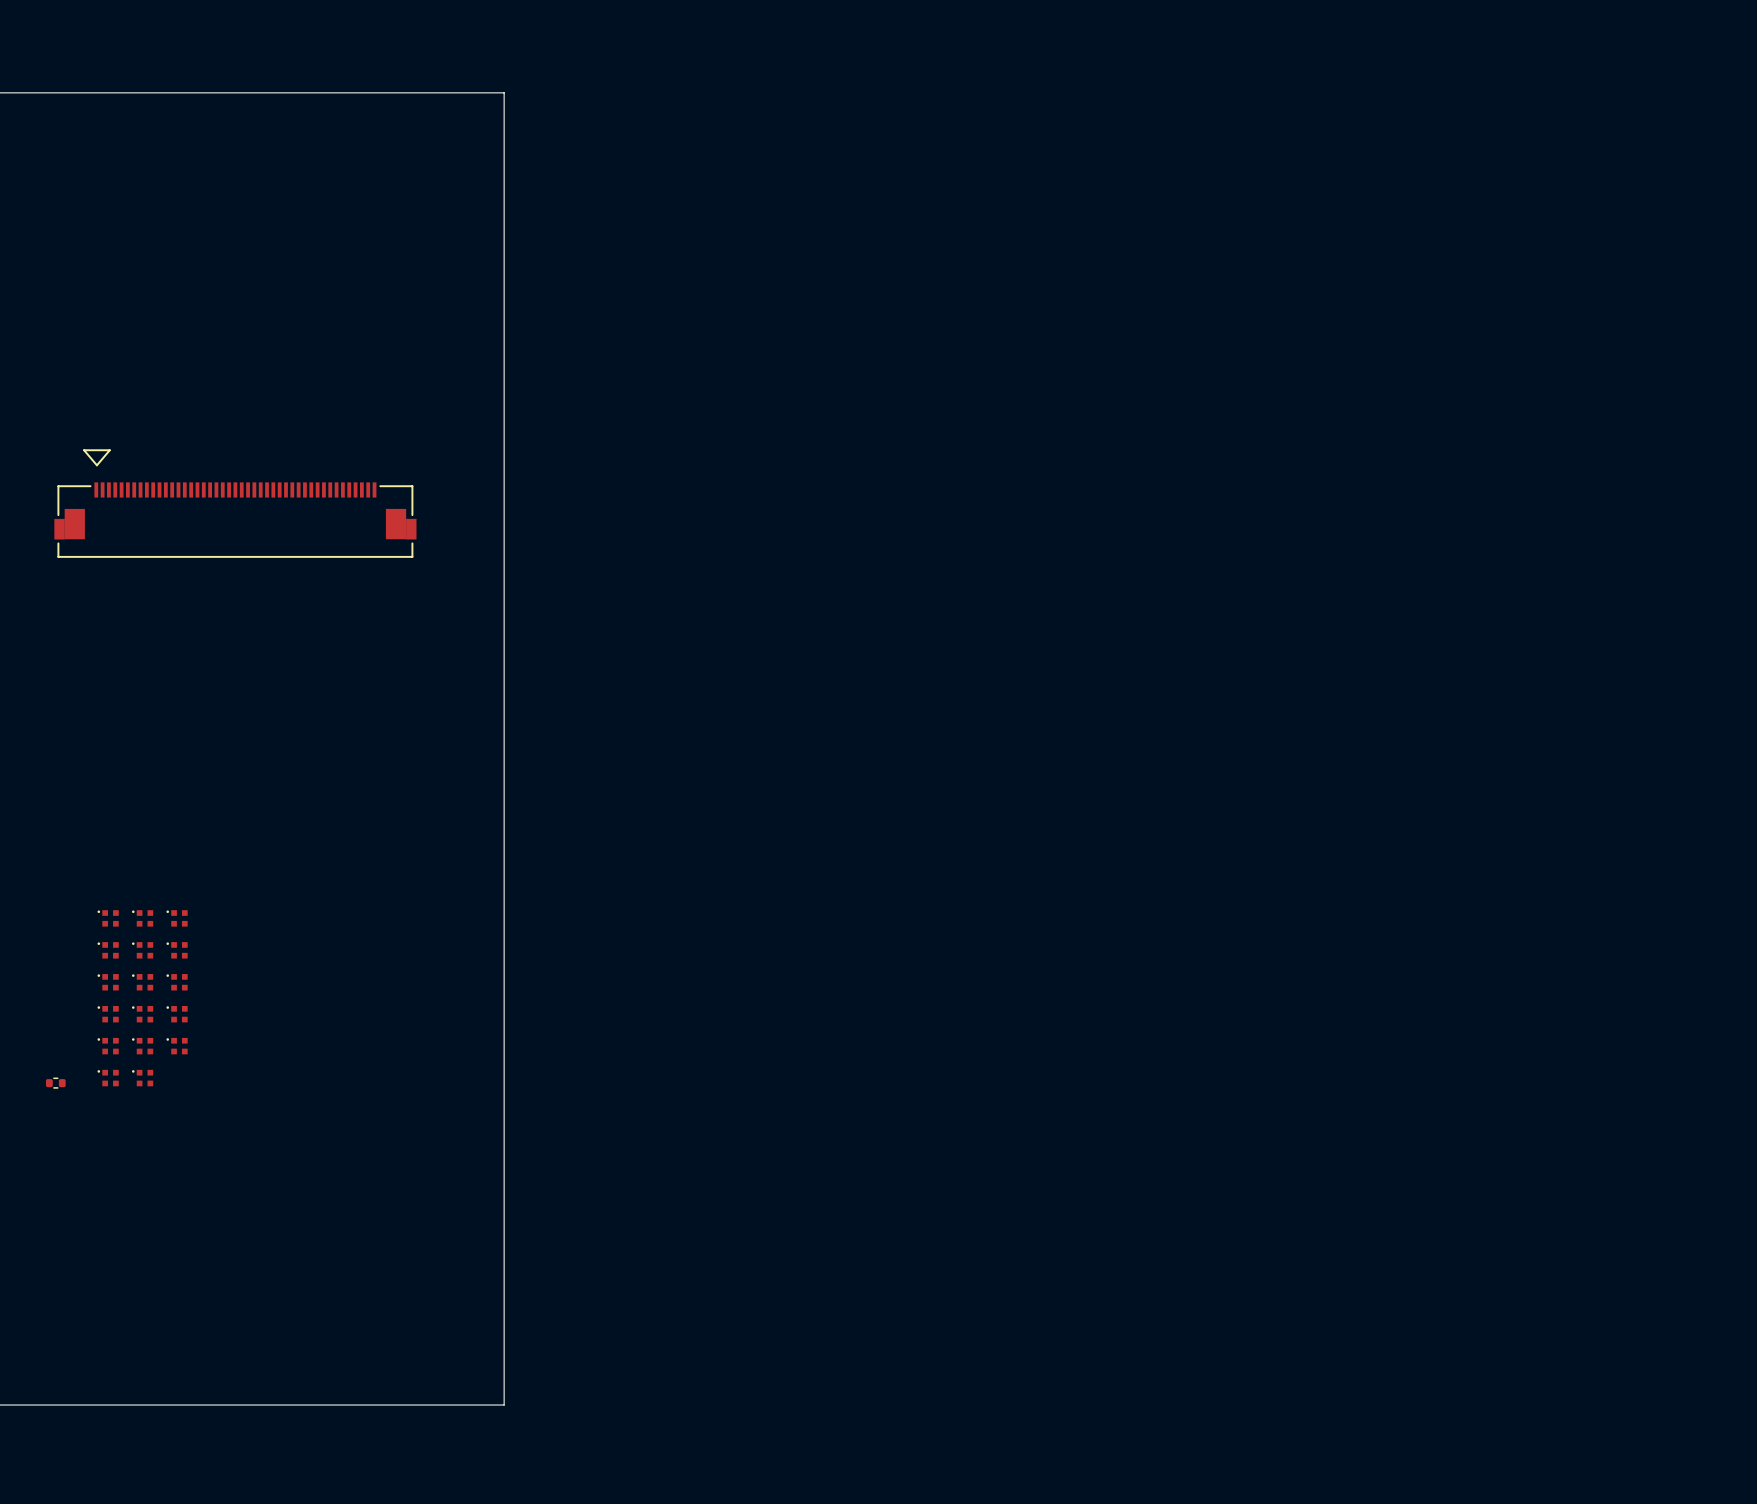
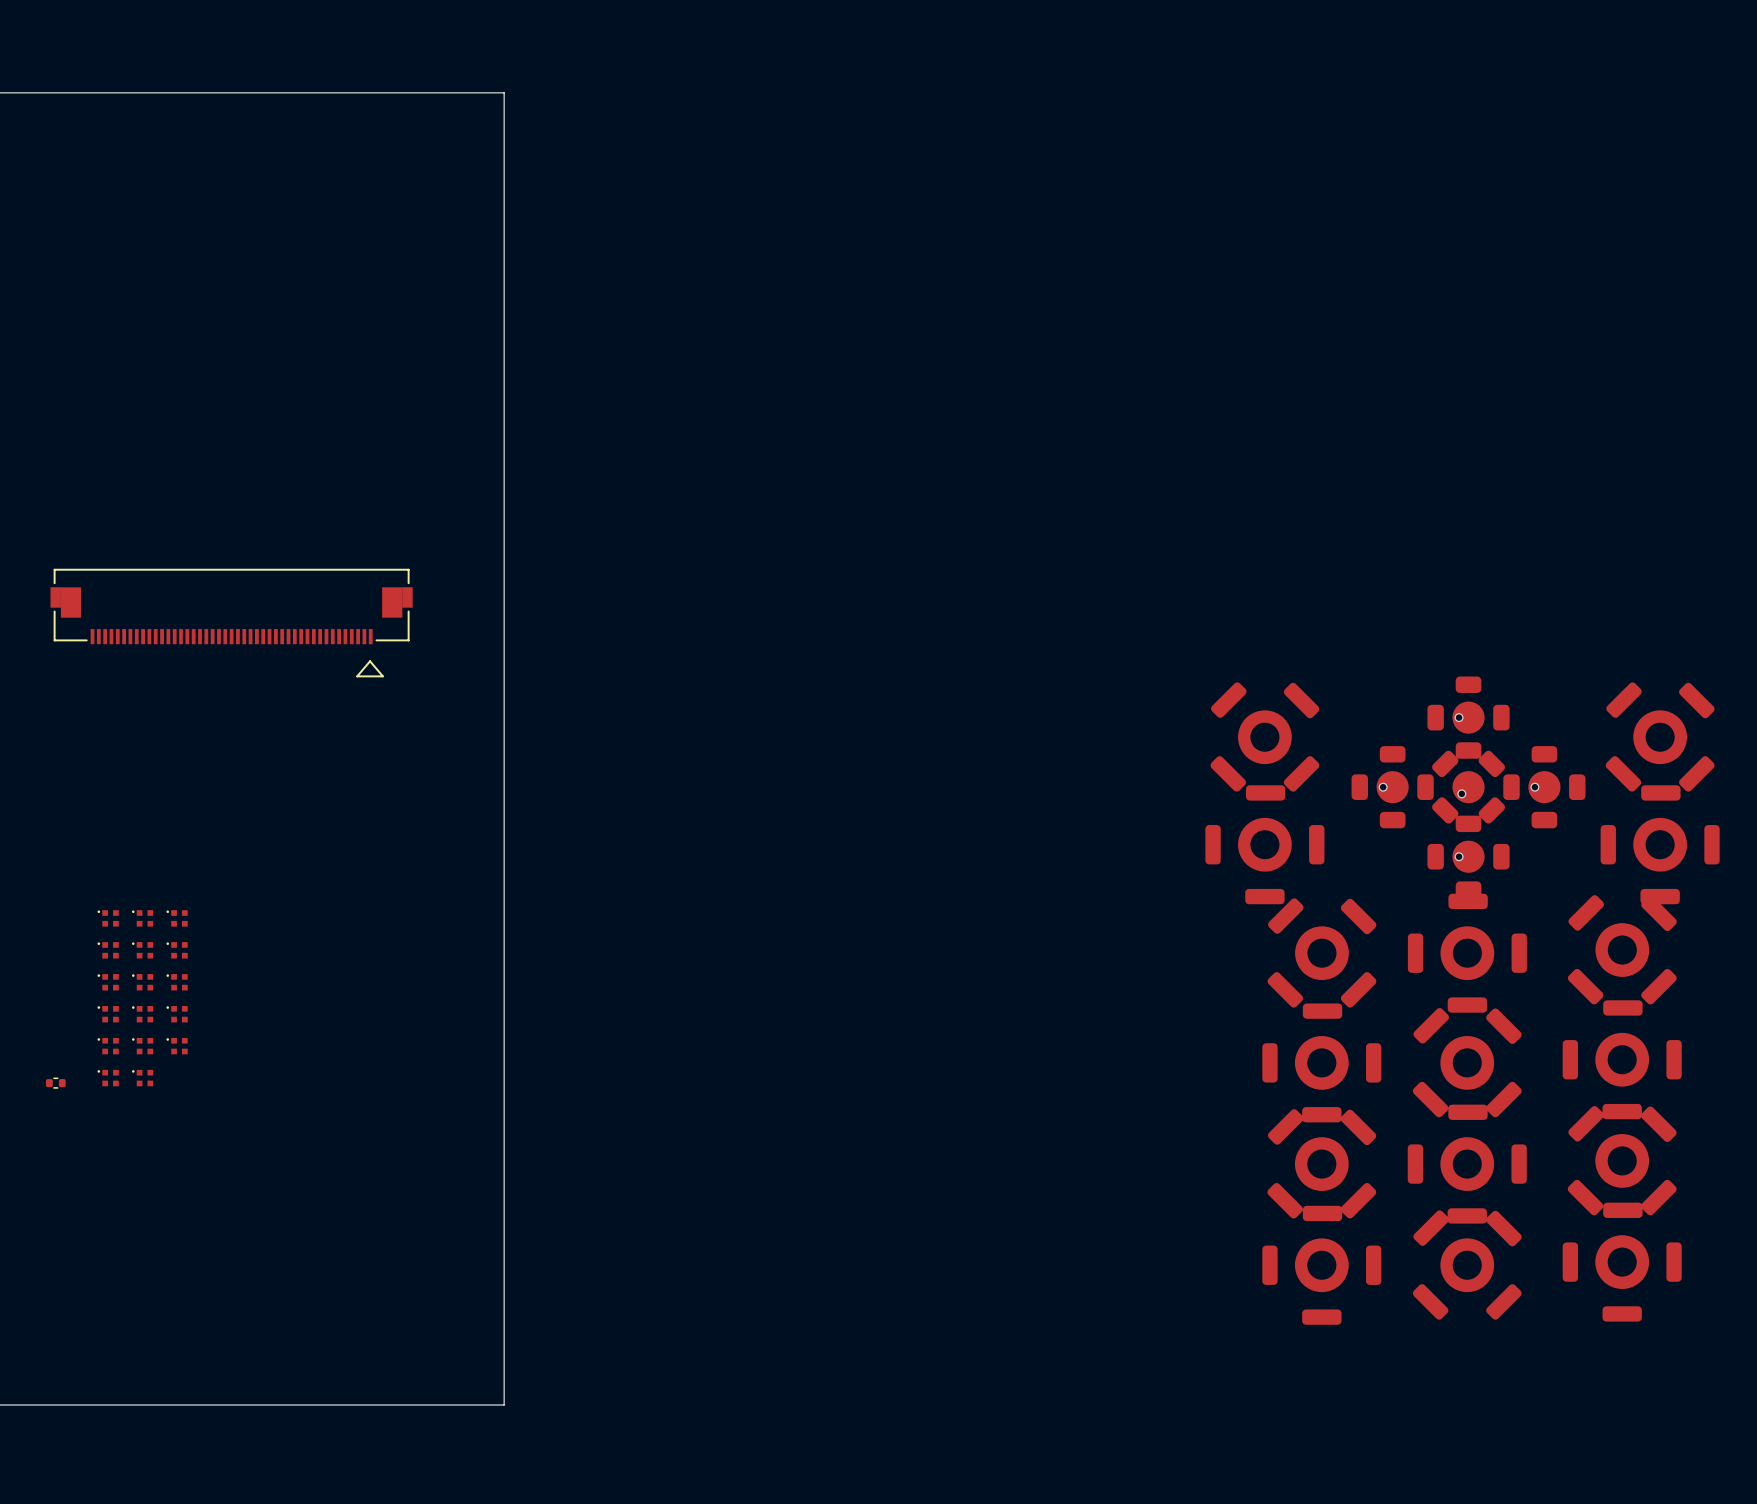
part rotation: 0° (235, 503) -> 180° (231, 623)
part: none -> (1468, 717)
part: none -> (1264, 736)
part: none -> (1660, 736)
part: none -> (1392, 787)
part: none -> (1468, 787)
part: none -> (1544, 787)
part: none -> (1264, 844)
part: none -> (1660, 844)
part: none -> (1468, 856)
part: none -> (1622, 949)
part: none -> (1321, 952)
part: none -> (1467, 953)
part: none -> (1622, 1059)
part: none -> (1321, 1062)
part: none -> (1467, 1062)
part: none -> (1622, 1160)
part: none -> (1321, 1163)
part: none -> (1467, 1164)
part: none -> (1622, 1262)
part: none -> (1321, 1265)
part: none -> (1467, 1265)

